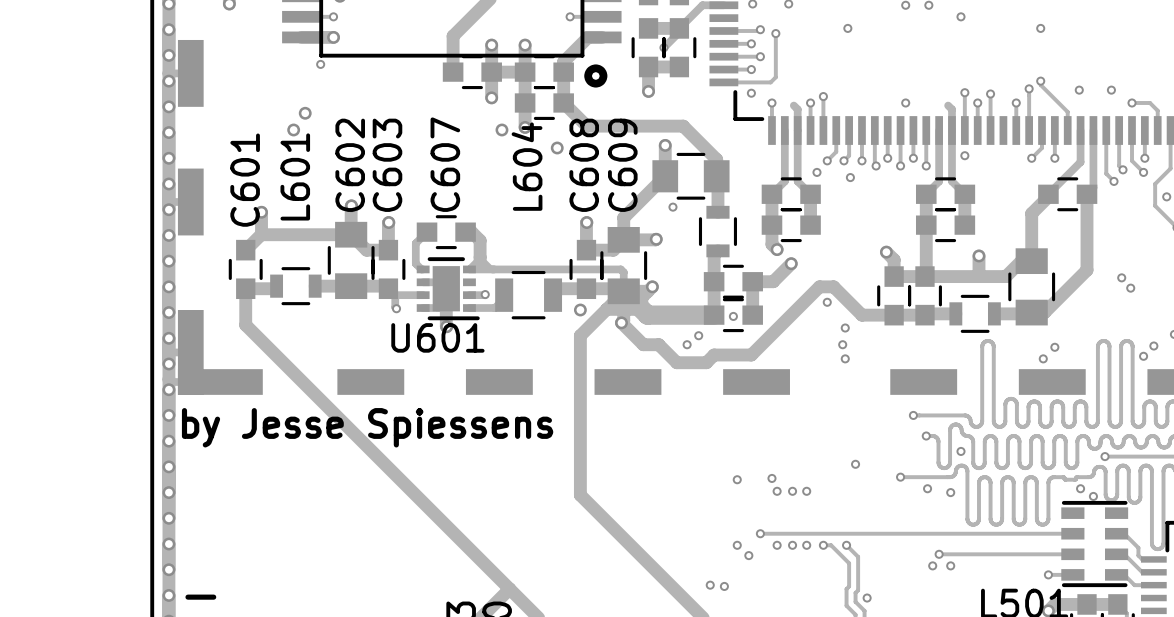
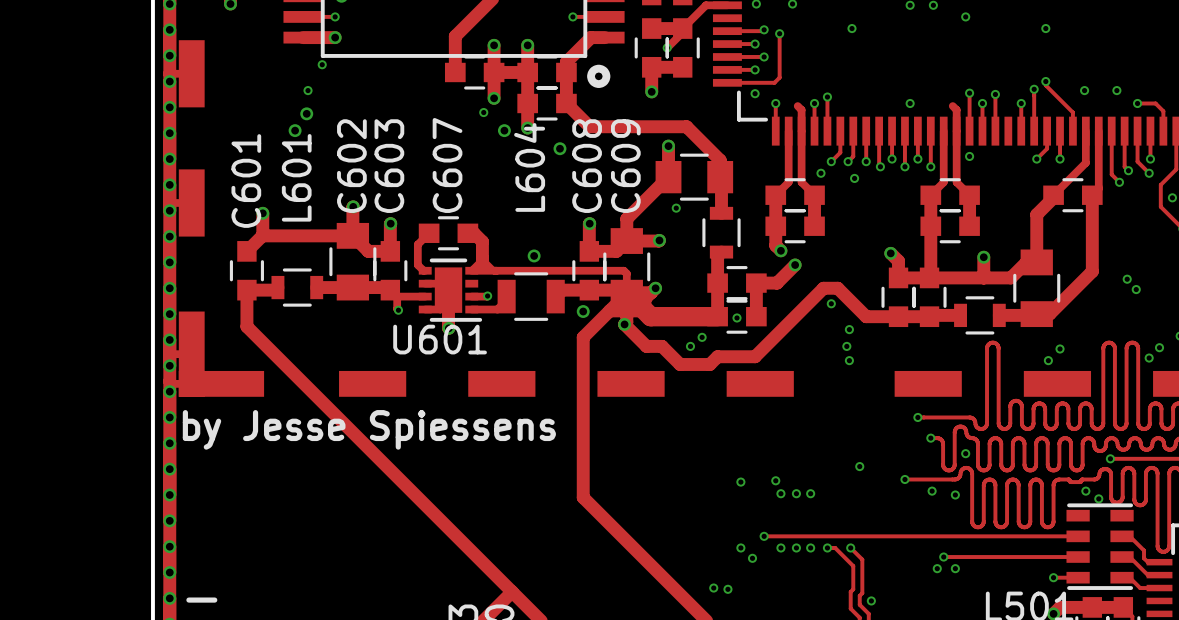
via: none -> (308, 90)
via: none -> (483, 112)
via: none -> (534, 255)

